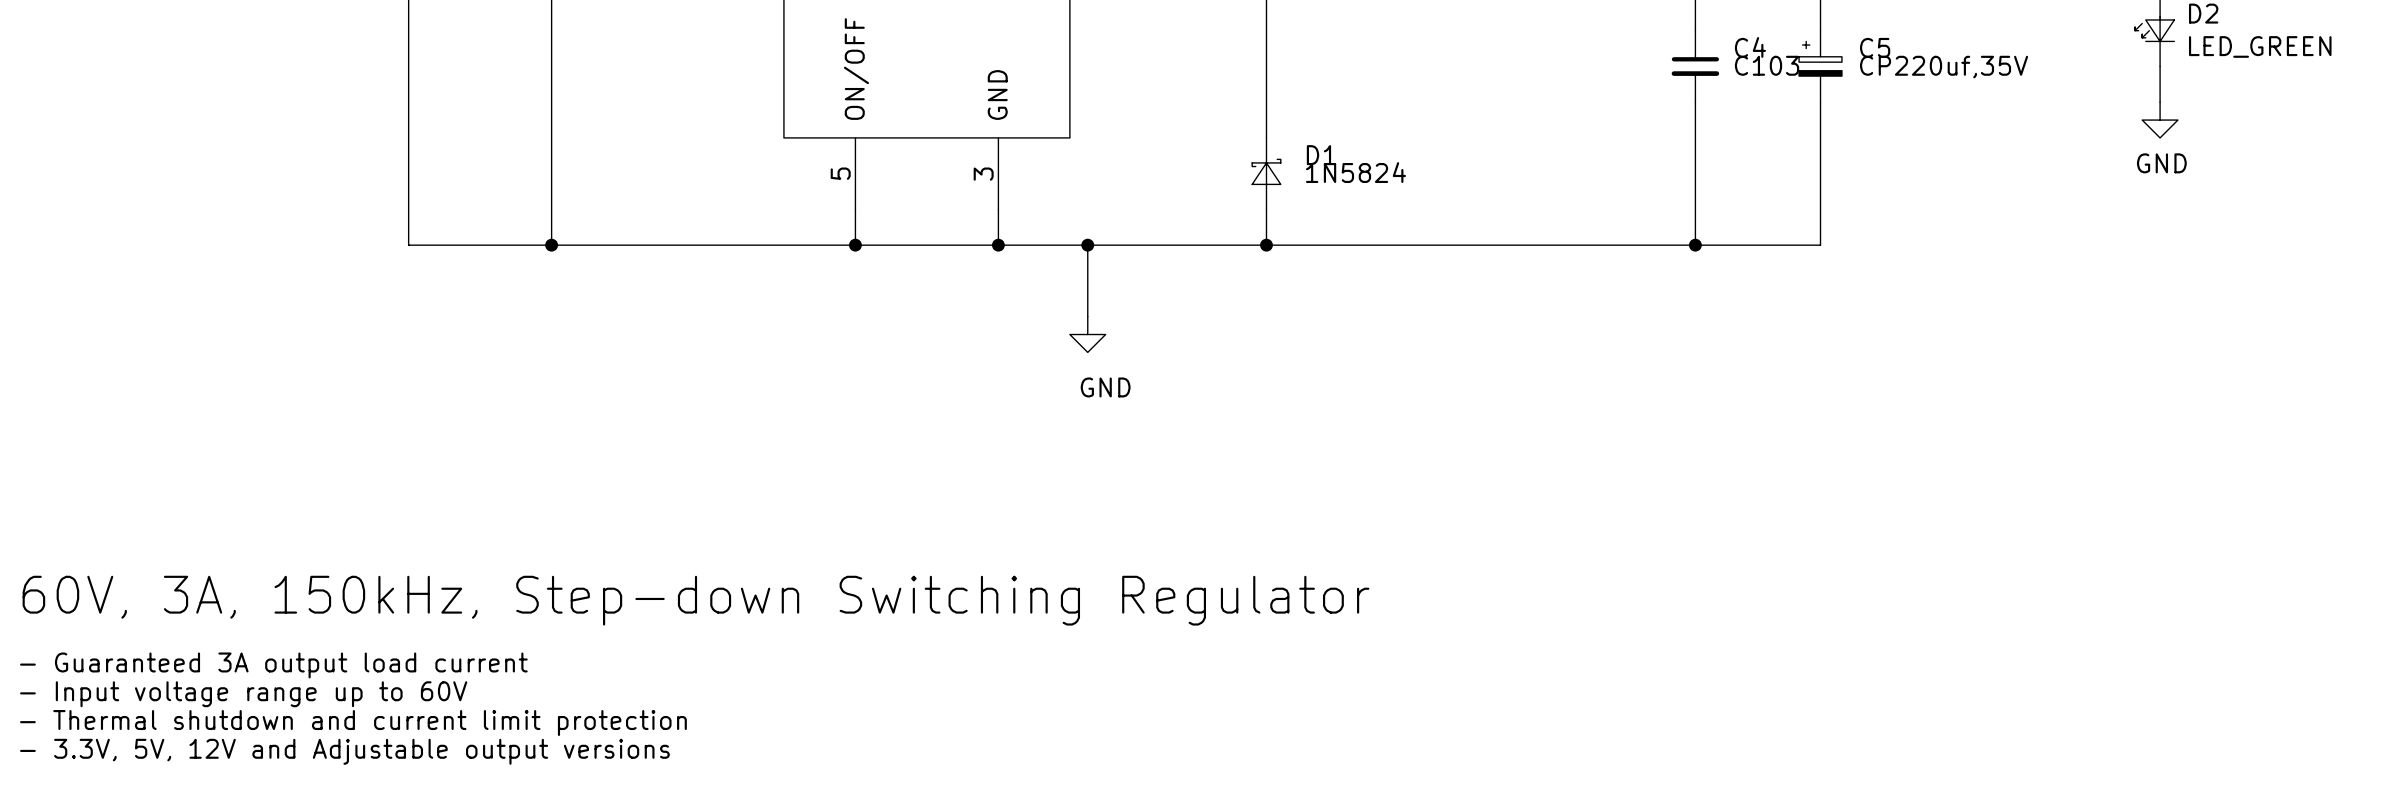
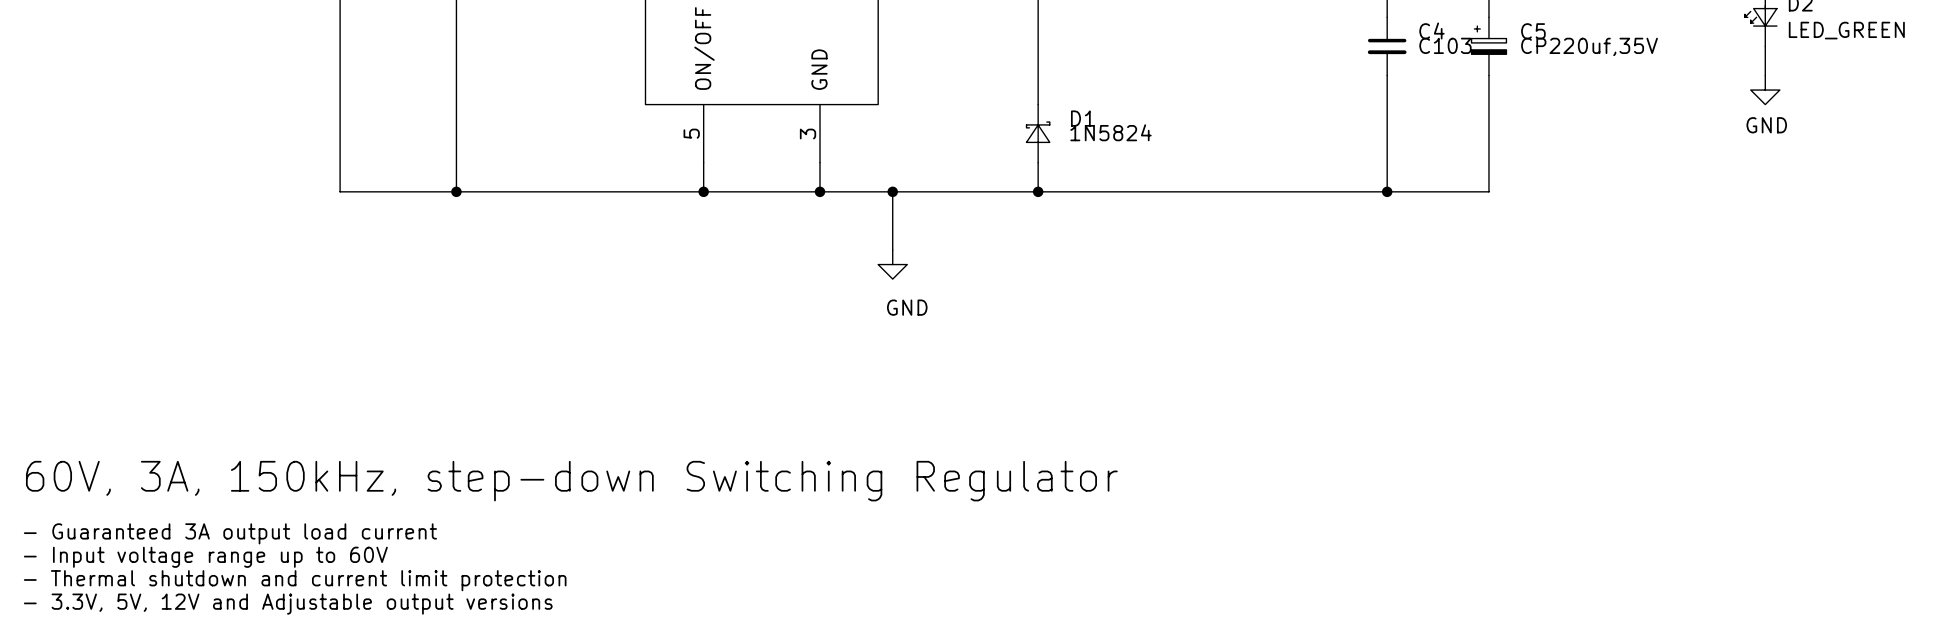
text: 60V, 3A, 150kHz, Step-down Switching Regulator (696, 600) -> 60V, 3A, 150kHz, step-down Switching Regulator (571, 481)

